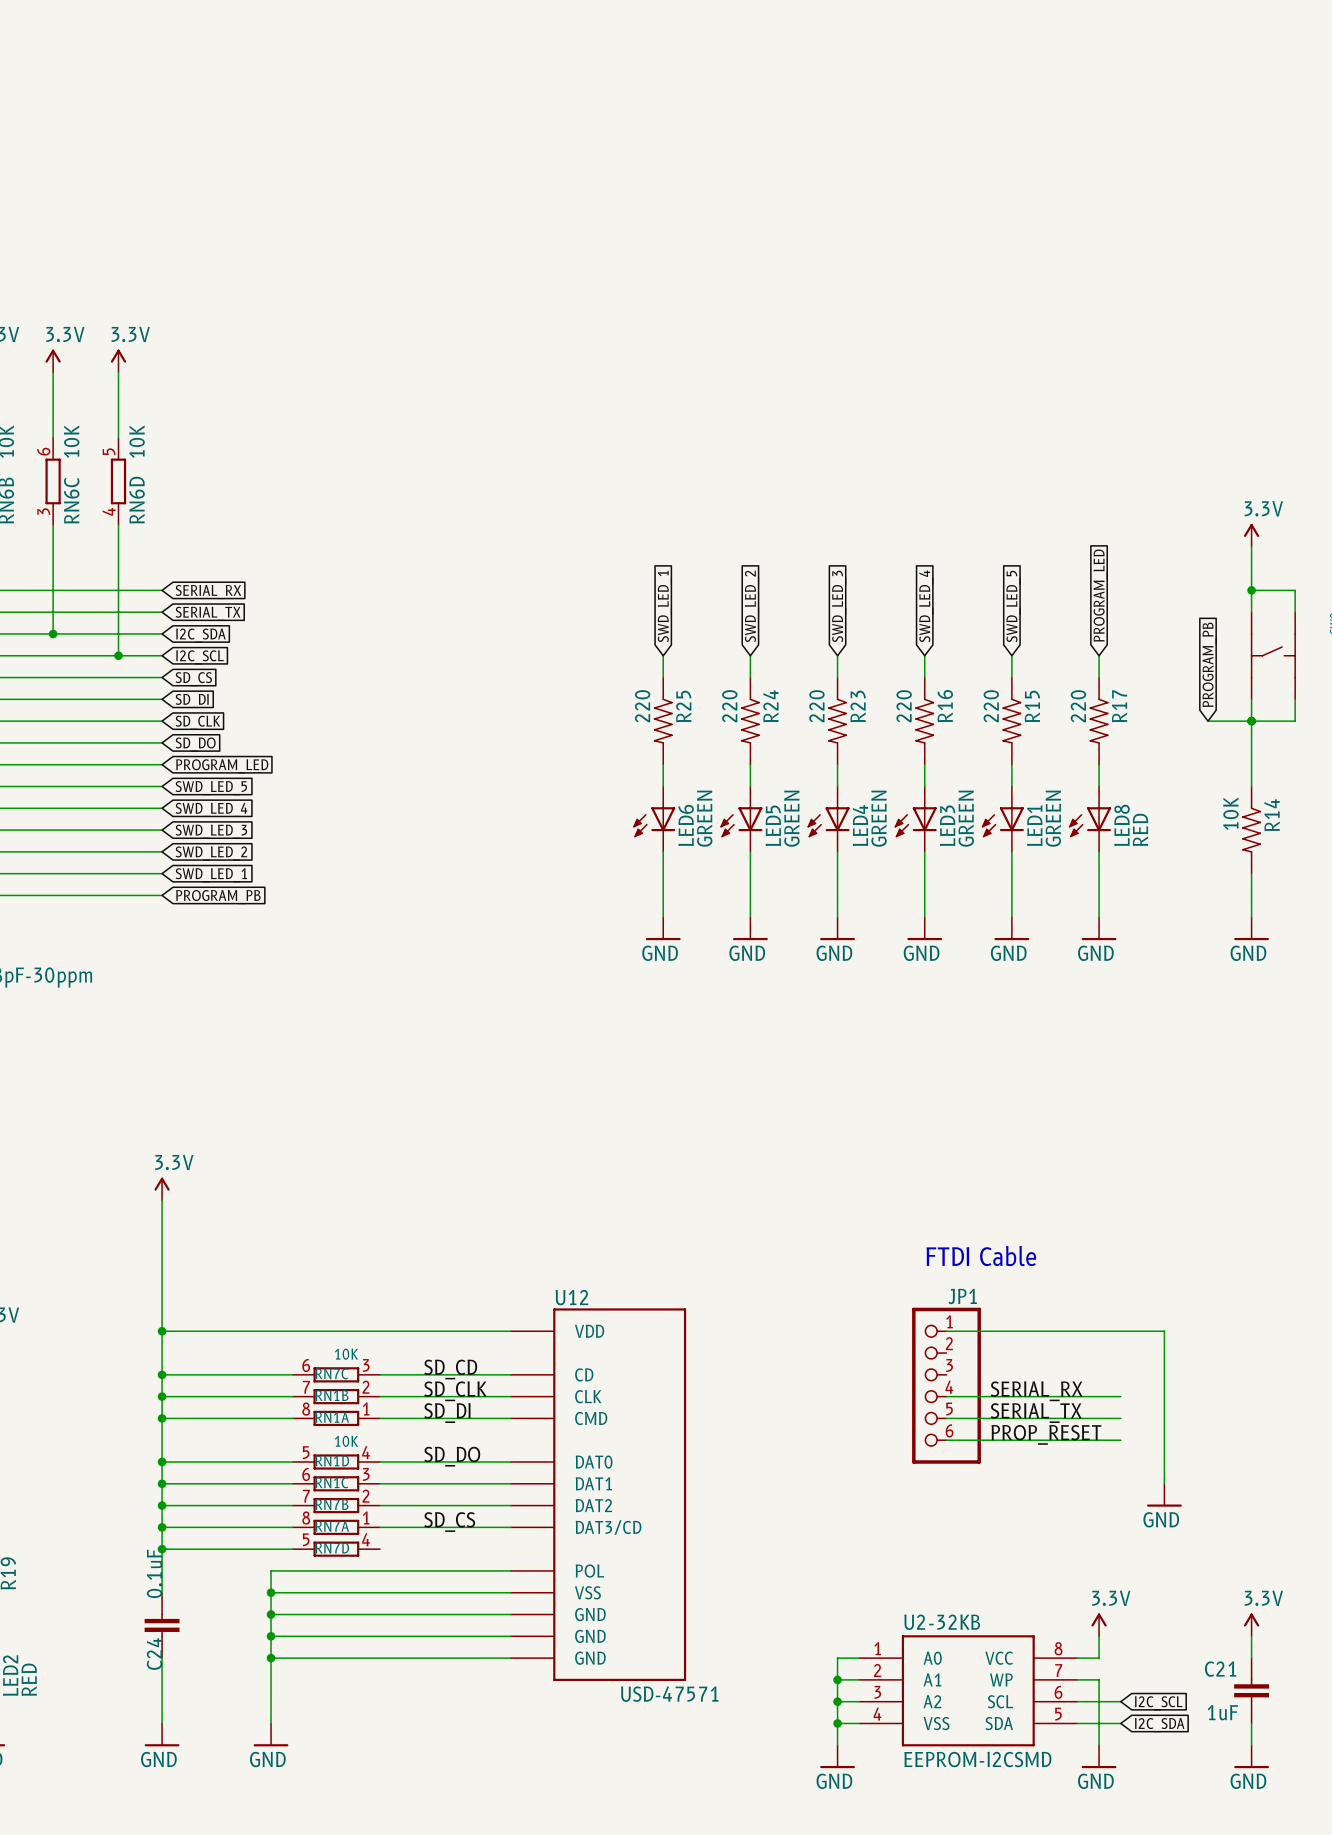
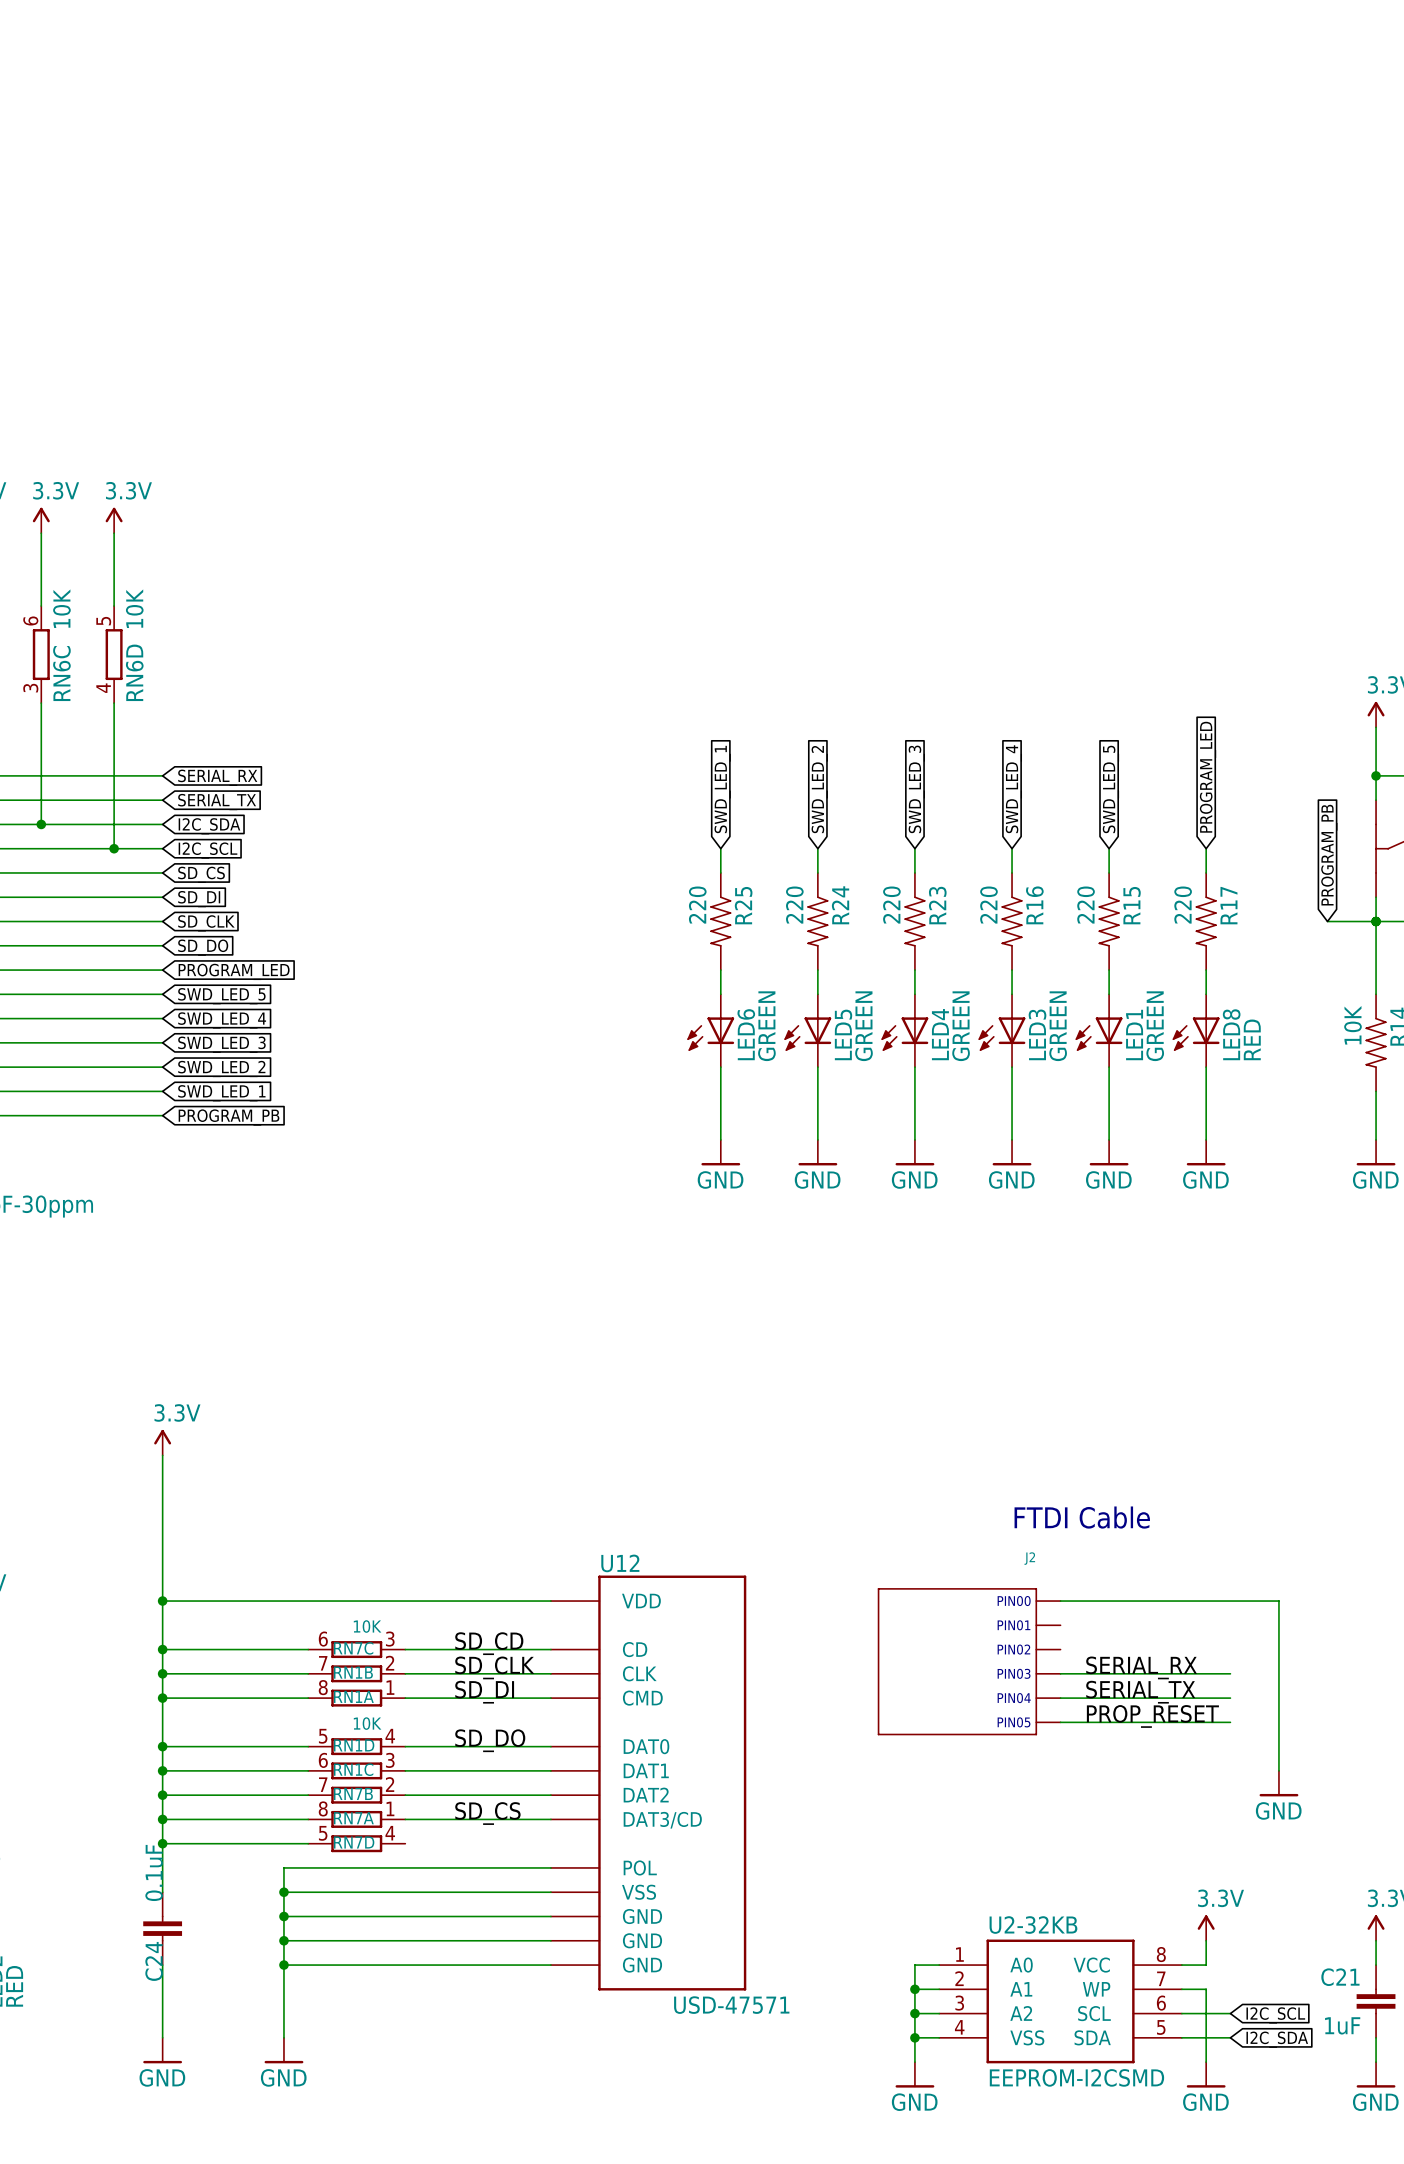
J2: none -> (969, 1661)
JP1: (946, 1385) -> none

